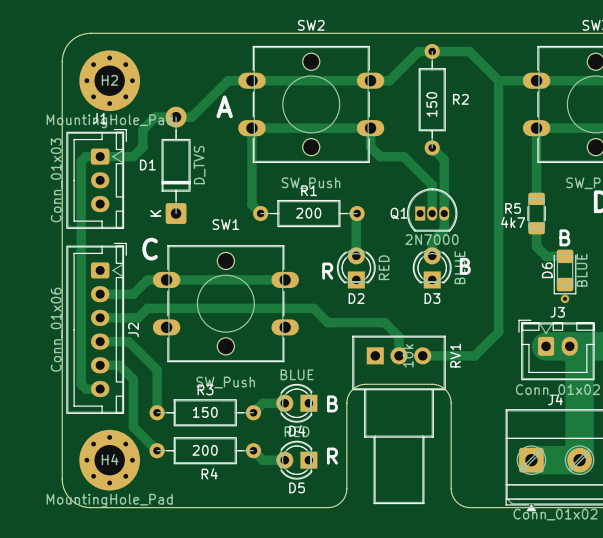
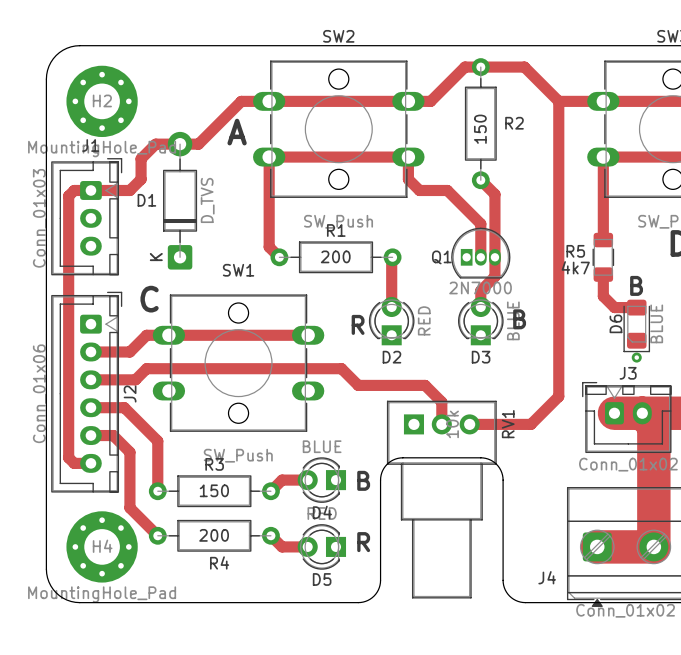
J4 name position: J4 (555, 399) -> J4 (547, 577)

